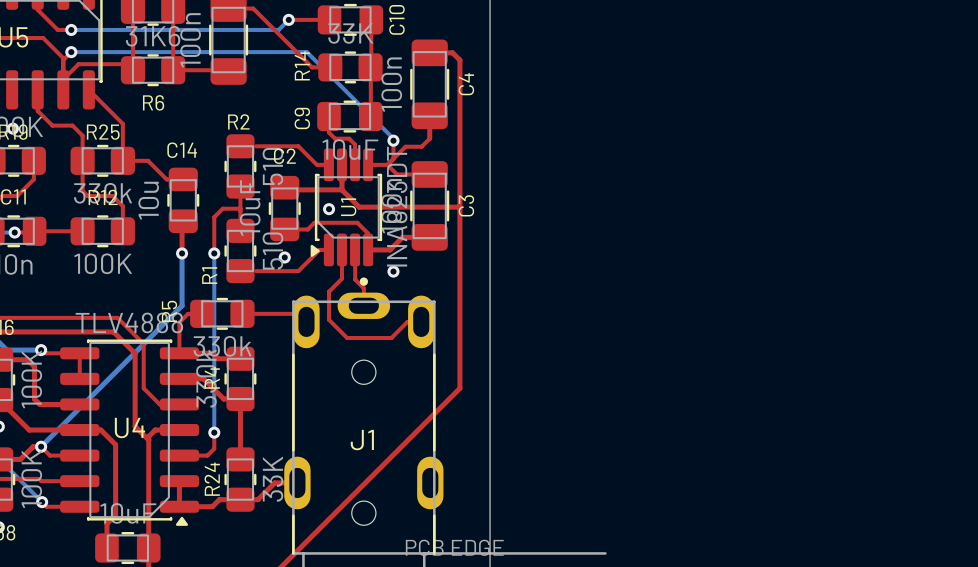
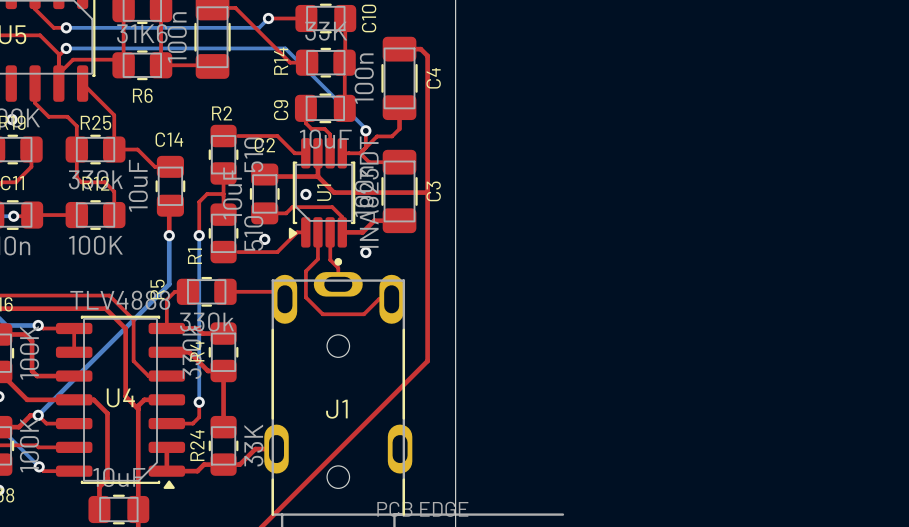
C14 value: 10u (148, 200) -> 10uF (138, 185)

